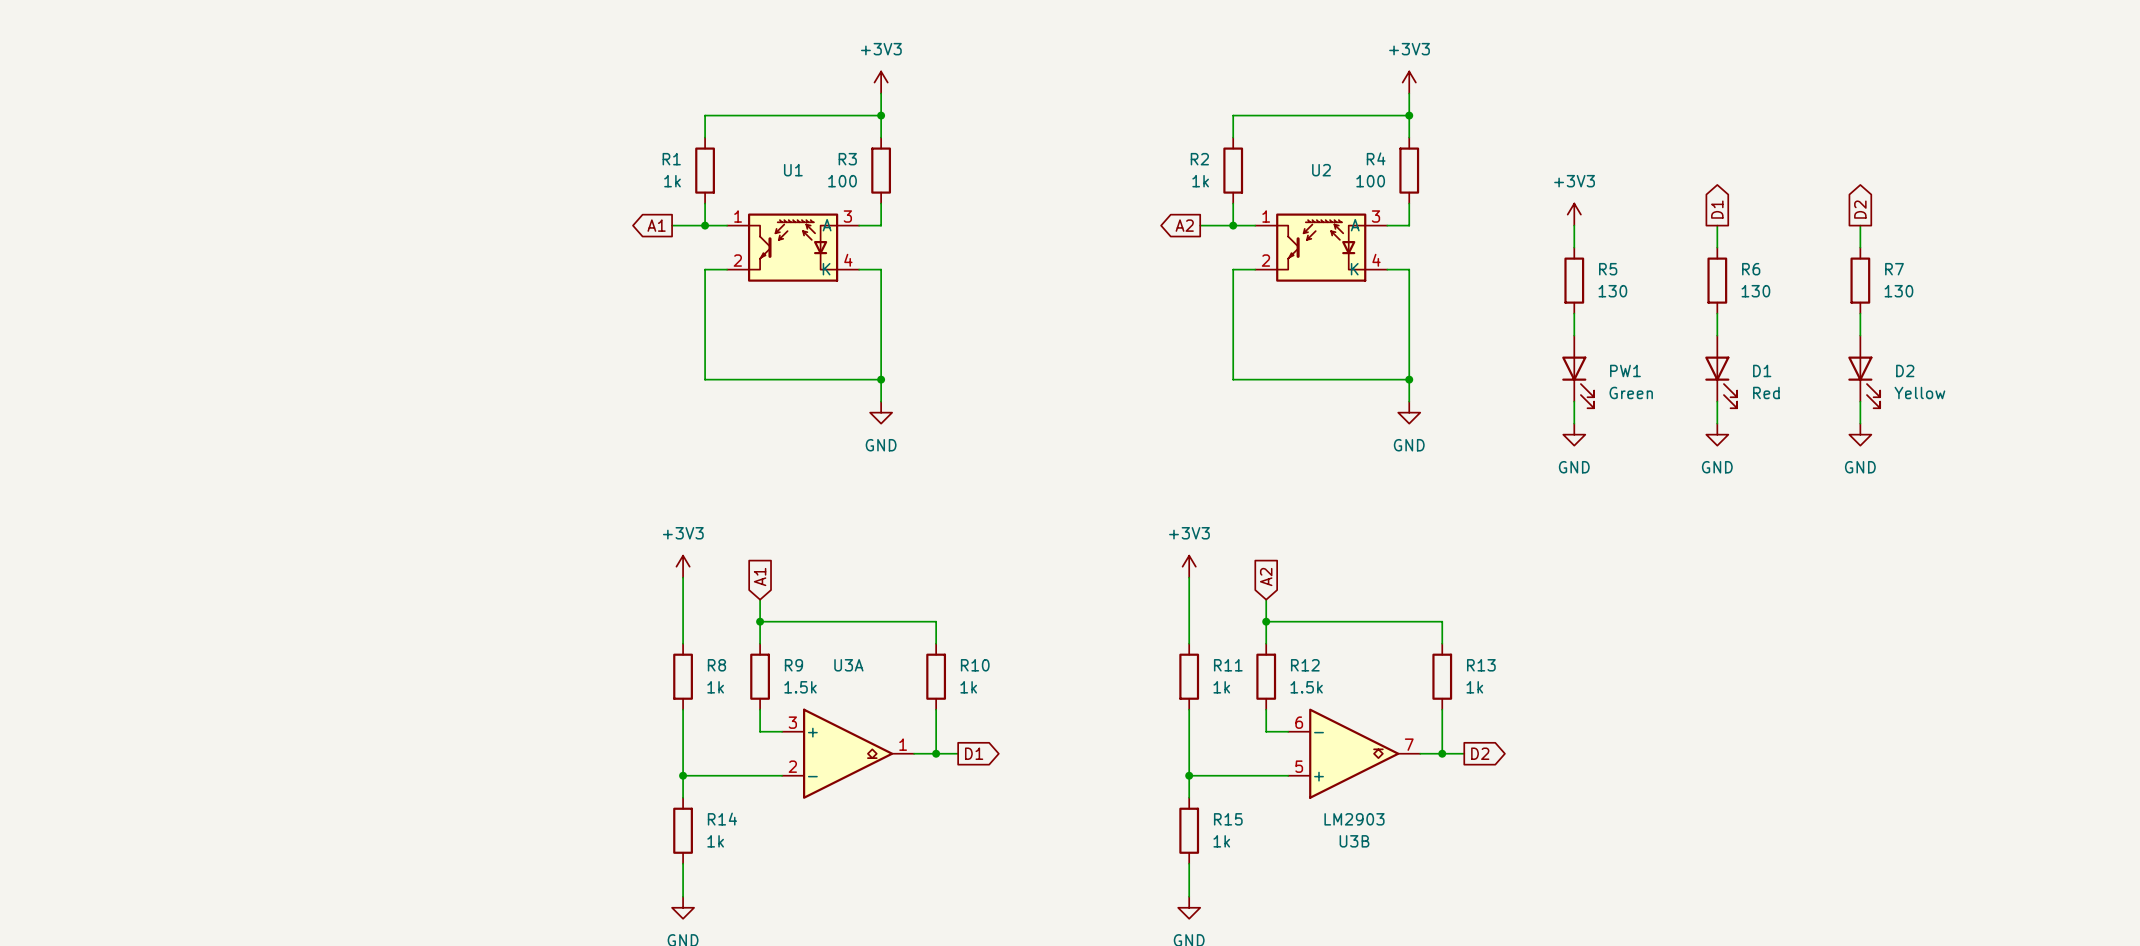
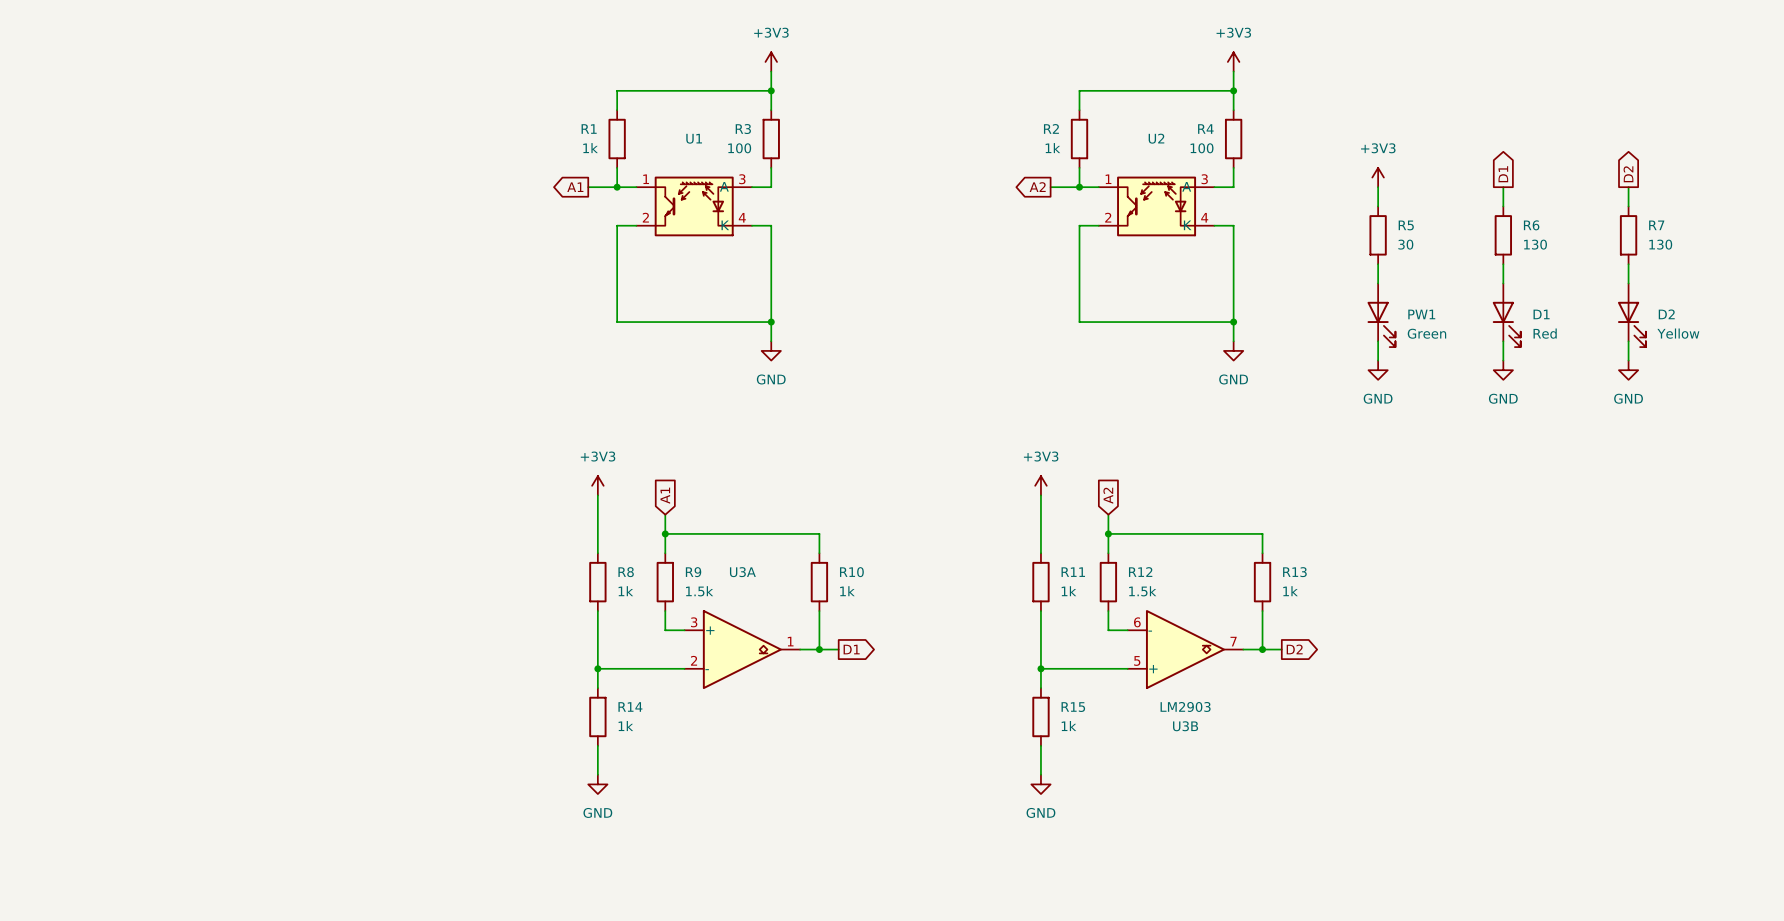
R5 value: 130 (1612, 291) -> 30 (1405, 244)

